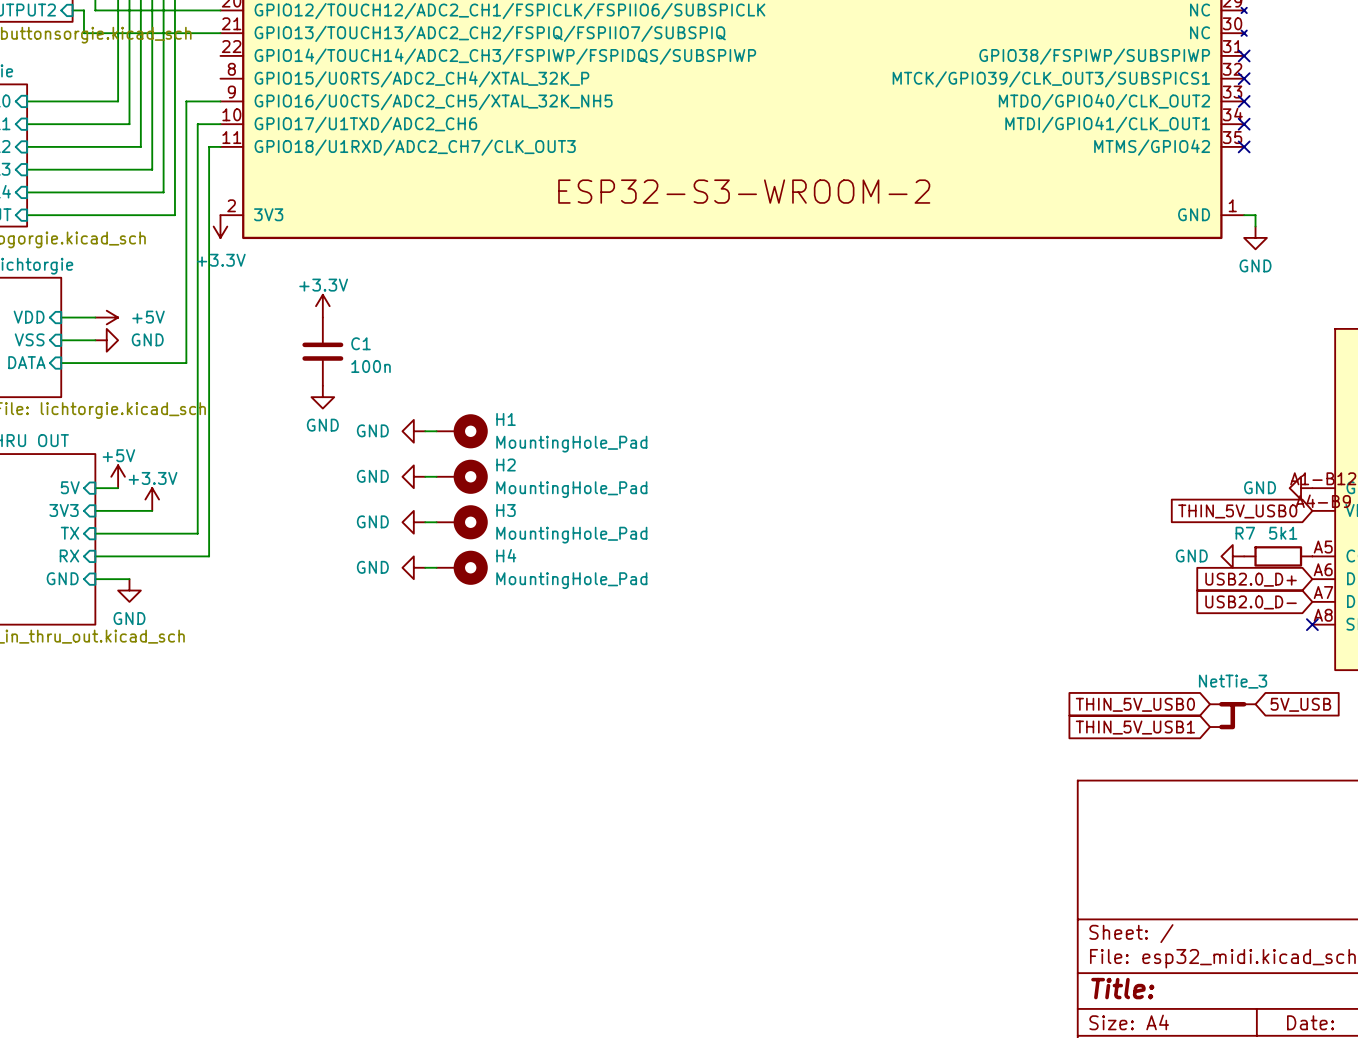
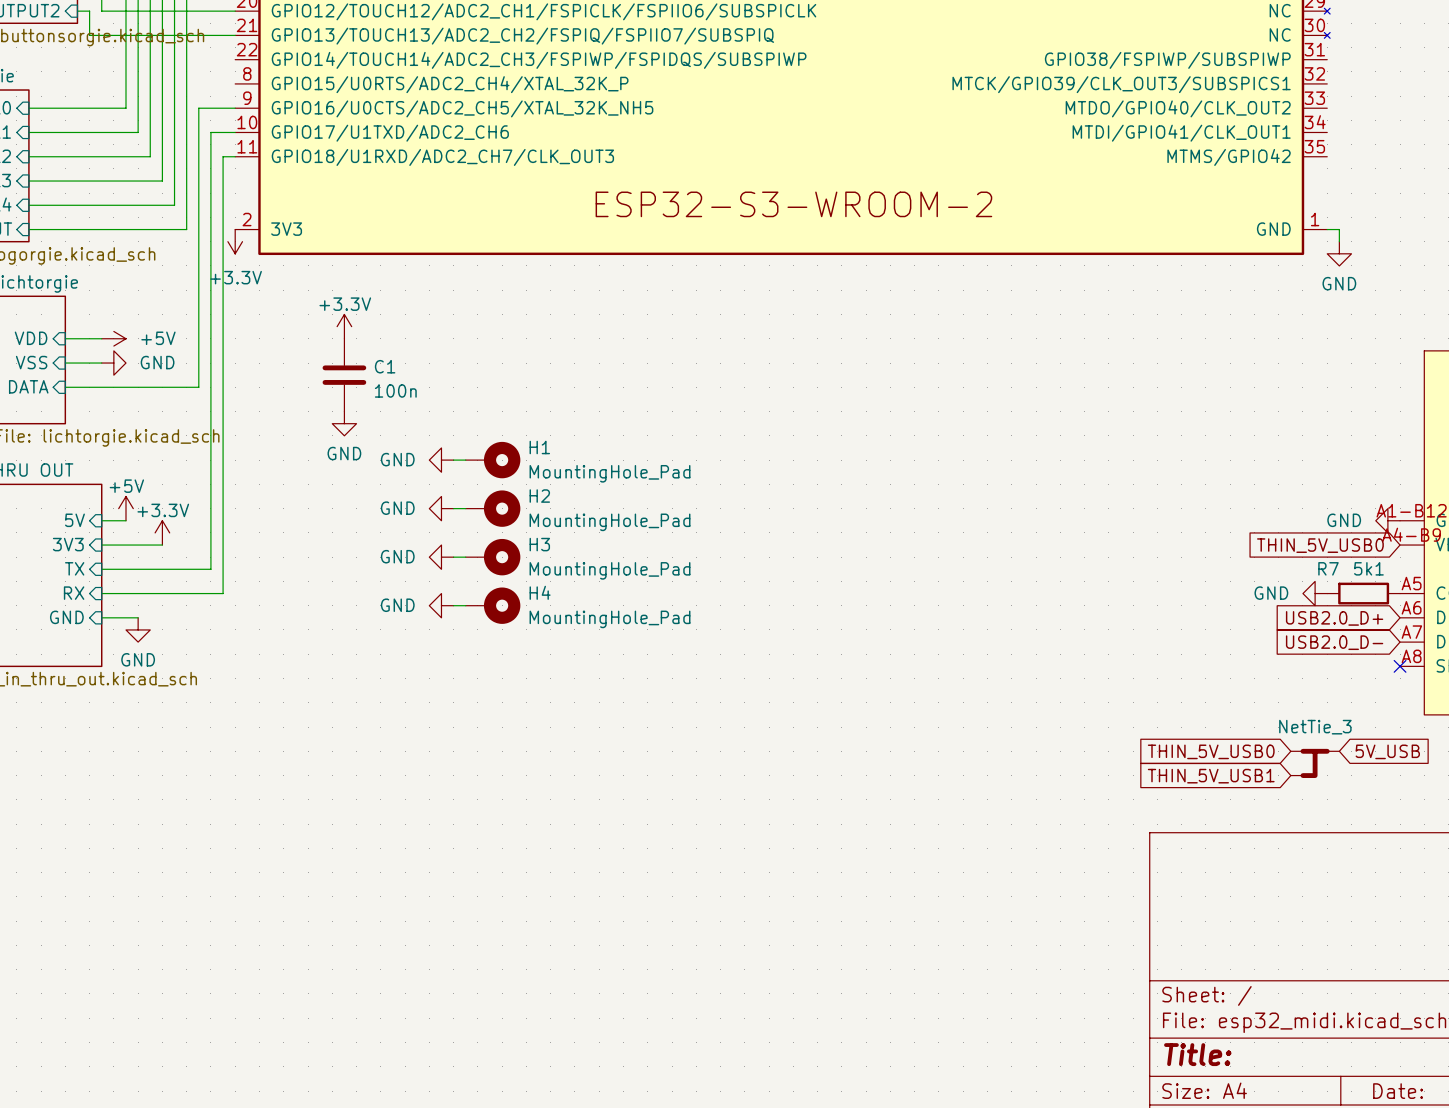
no-connect mark: (1244, 55) -> none
no-connect mark: (1244, 78) -> none
no-connect mark: (1244, 101) -> none
no-connect mark: (1244, 124) -> none
no-connect mark: (1244, 146) -> none

